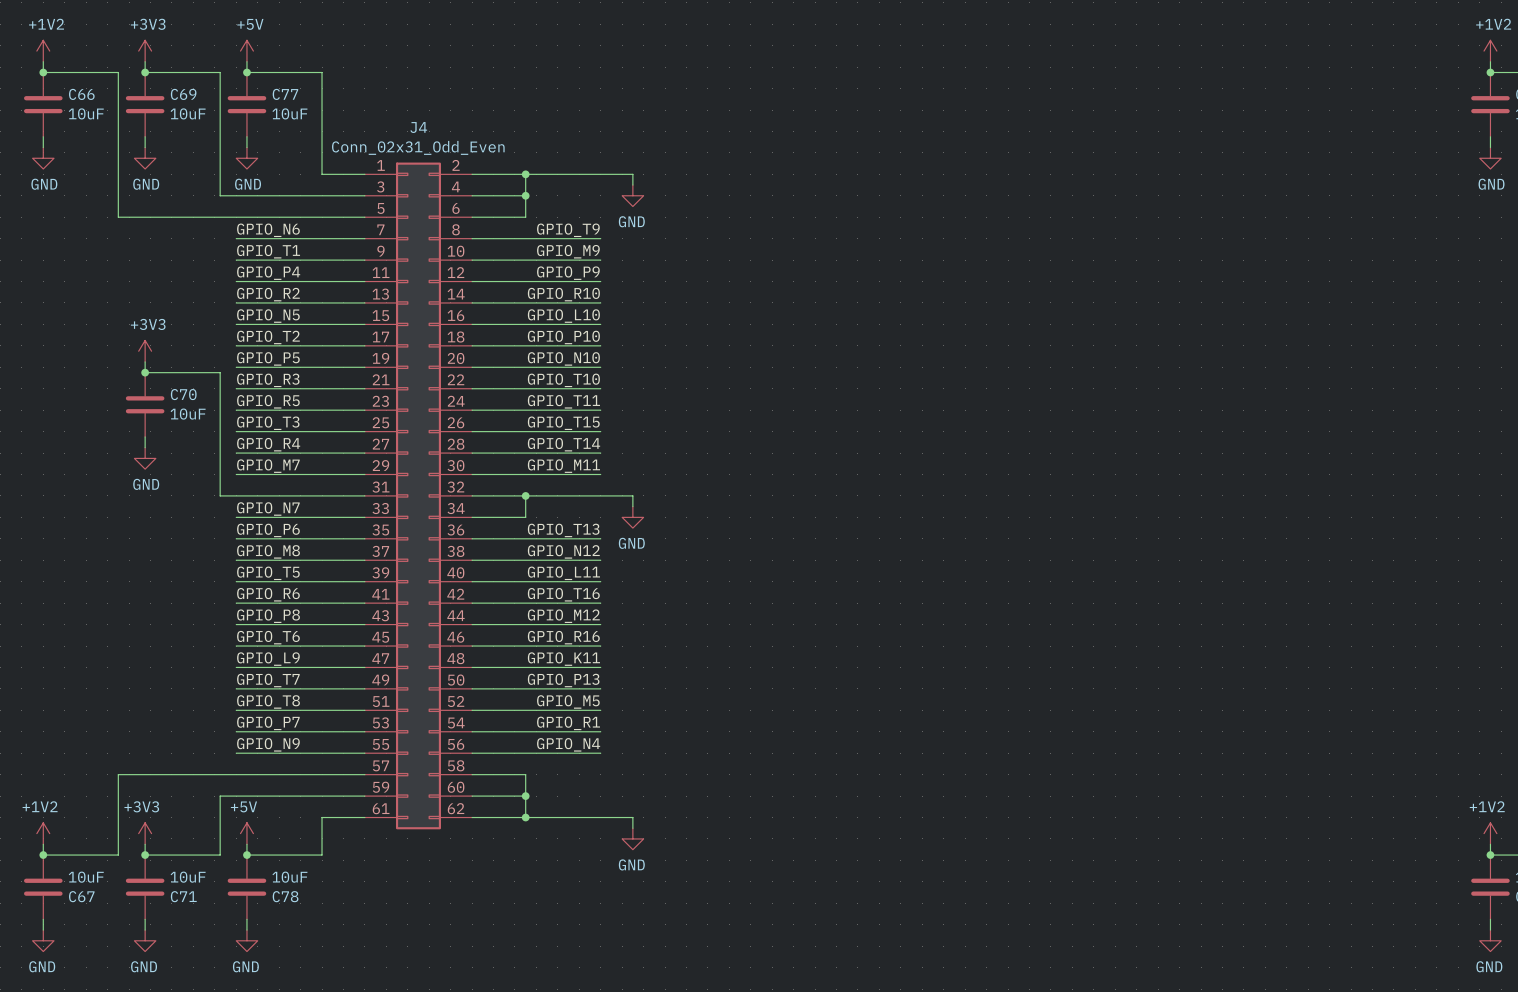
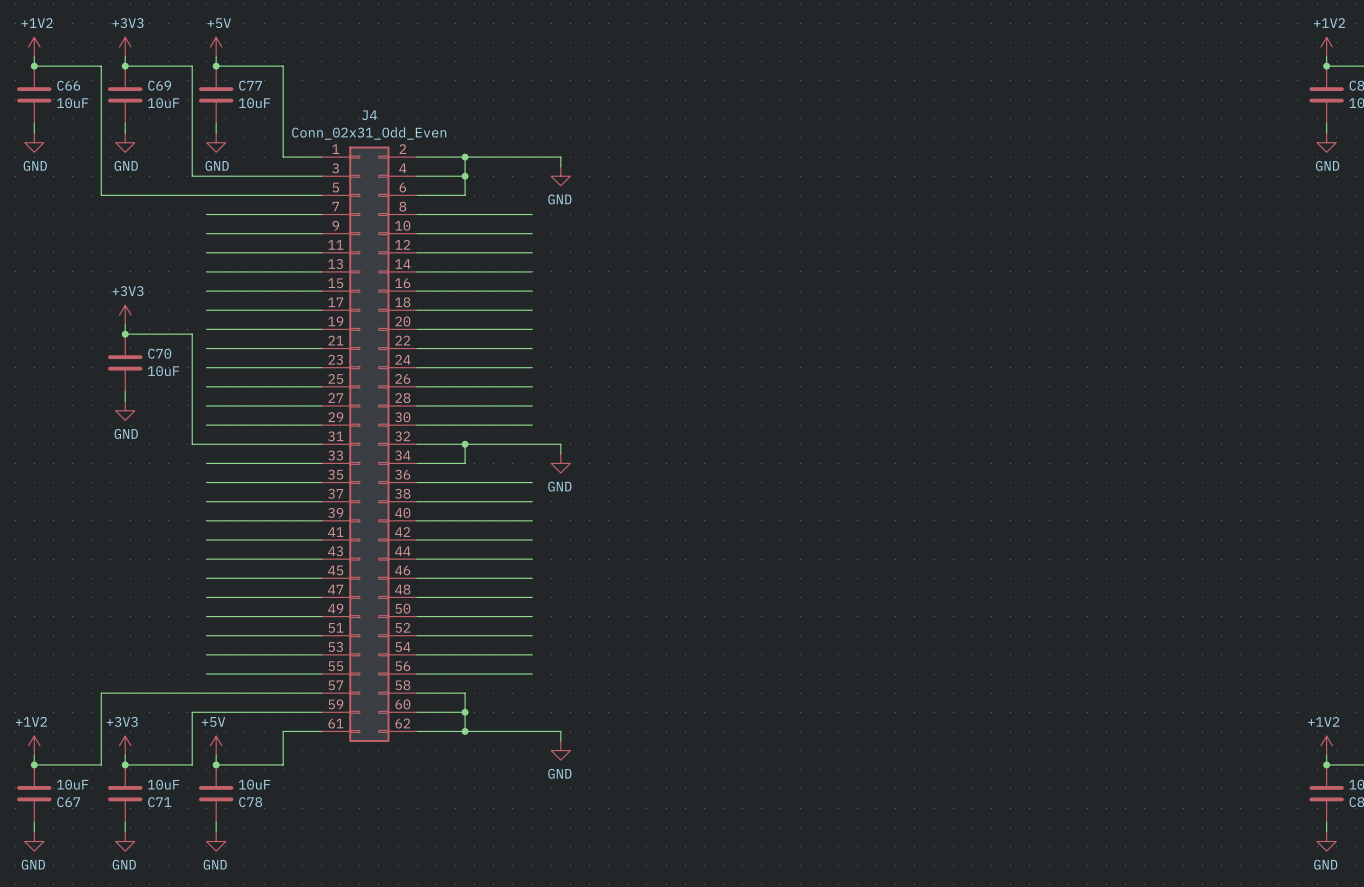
label: GPIO_N6 (268, 230) -> none
label: GPIO_T9 (568, 230) -> none
label: GPIO_T1 (268, 251) -> none
label: GPIO_M9 (568, 251) -> none
label: GPIO_P4 (268, 273) -> none
label: GPIO_P9 (568, 273) -> none
label: GPIO_R2 (268, 294) -> none
label: GPIO_R10 (563, 294) -> none
label: GPIO_N5 (268, 316) -> none
label: GPIO_L10 (563, 316) -> none
label: GPIO_T2 (268, 337) -> none
label: GPIO_P10 (563, 337) -> none
label: GPIO_P5 (268, 358) -> none
label: GPIO_N10 (563, 358) -> none
label: GPIO_R3 (268, 380) -> none
label: GPIO_T10 (563, 380) -> none
label: GPIO_R5 (268, 401) -> none
label: GPIO_T11 (563, 401) -> none
label: GPIO_T3 (268, 423) -> none
label: GPIO_T15 (563, 423) -> none
label: GPIO_R4 (268, 444) -> none
label: GPIO_T14 (564, 444) -> none
label: GPIO_M7 (268, 466) -> none
label: GPIO_M11 (563, 466) -> none
label: GPIO_N7 (268, 509) -> none
label: GPIO_P6 (268, 530) -> none
label: GPIO_T13 (563, 530) -> none
label: GPIO_M8 (268, 551) -> none
label: GPIO_N12 (563, 551) -> none
label: GPIO_T5 (268, 573) -> none
label: GPIO_L11 (563, 573) -> none
label: GPIO_R6 (268, 594) -> none
label: GPIO_T16 (563, 594) -> none
label: GPIO_P8 (268, 616) -> none
label: GPIO_M12 (563, 616) -> none
label: GPIO_T6 (268, 637) -> none
label: GPIO_R16 (563, 637) -> none
label: GPIO_L9 (268, 659) -> none
label: GPIO_K11 (563, 659) -> none
label: GPIO_T7 (268, 680) -> none
label: GPIO_P13 (563, 680) -> none
label: GPIO_T8 (268, 701) -> none
label: GPIO_M5 (568, 701) -> none
label: GPIO_P7 (268, 723) -> none
label: GPIO_R1 (568, 723) -> none
label: GPIO_N9 (268, 744) -> none
label: GPIO_N4 (568, 744) -> none

